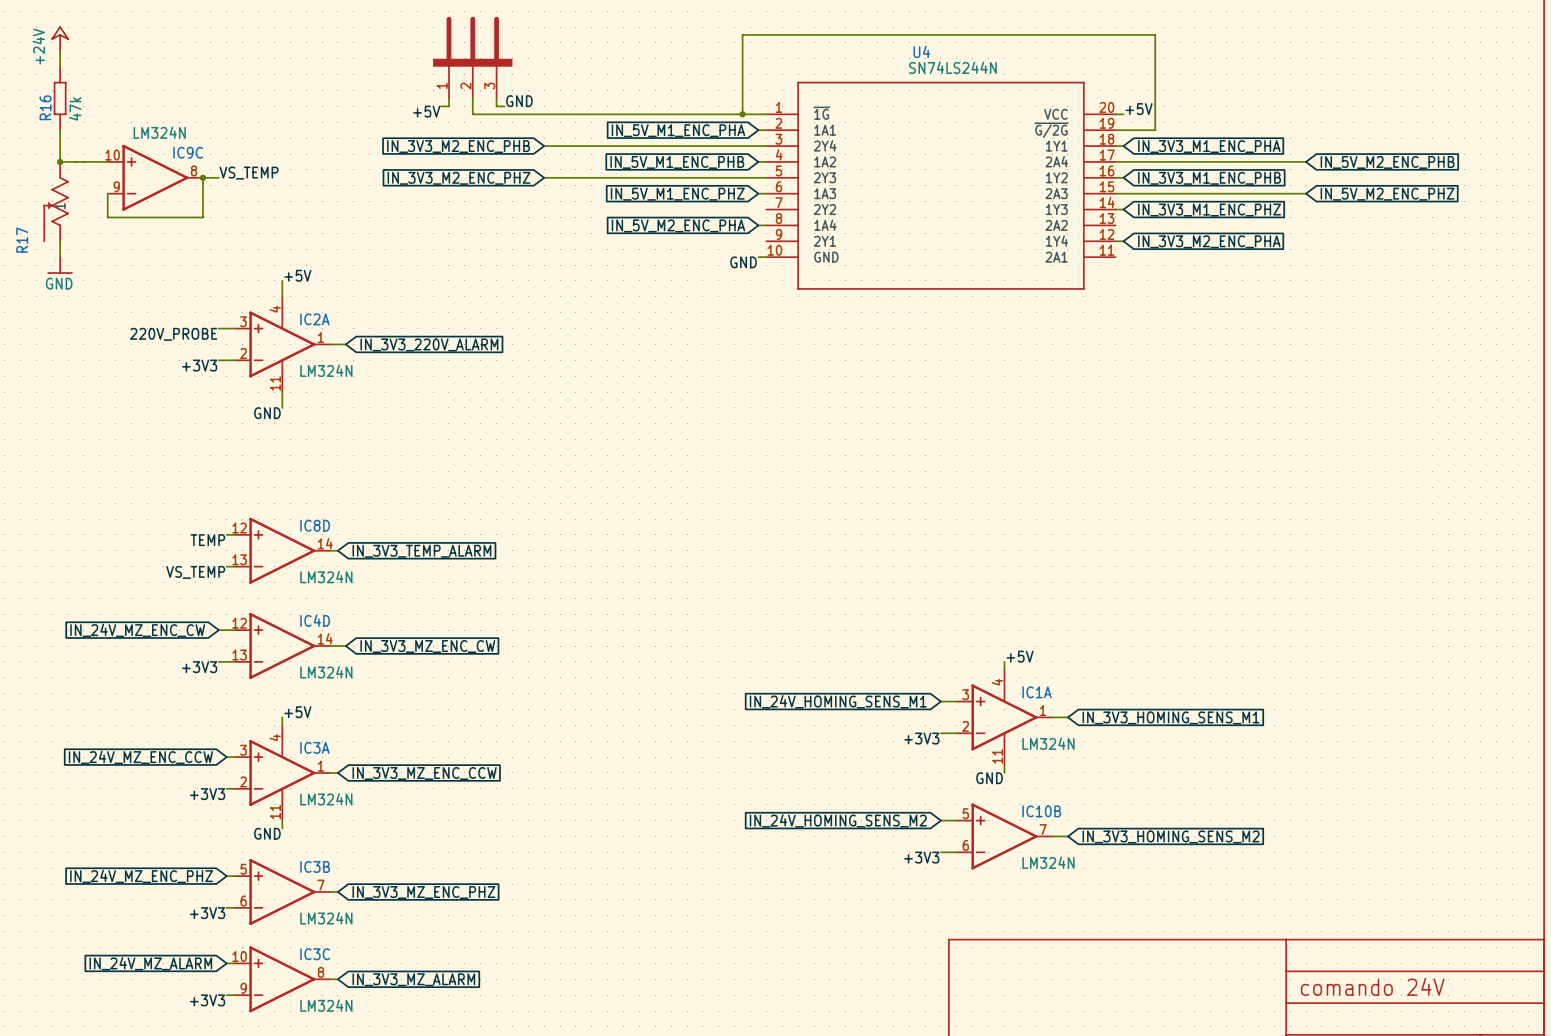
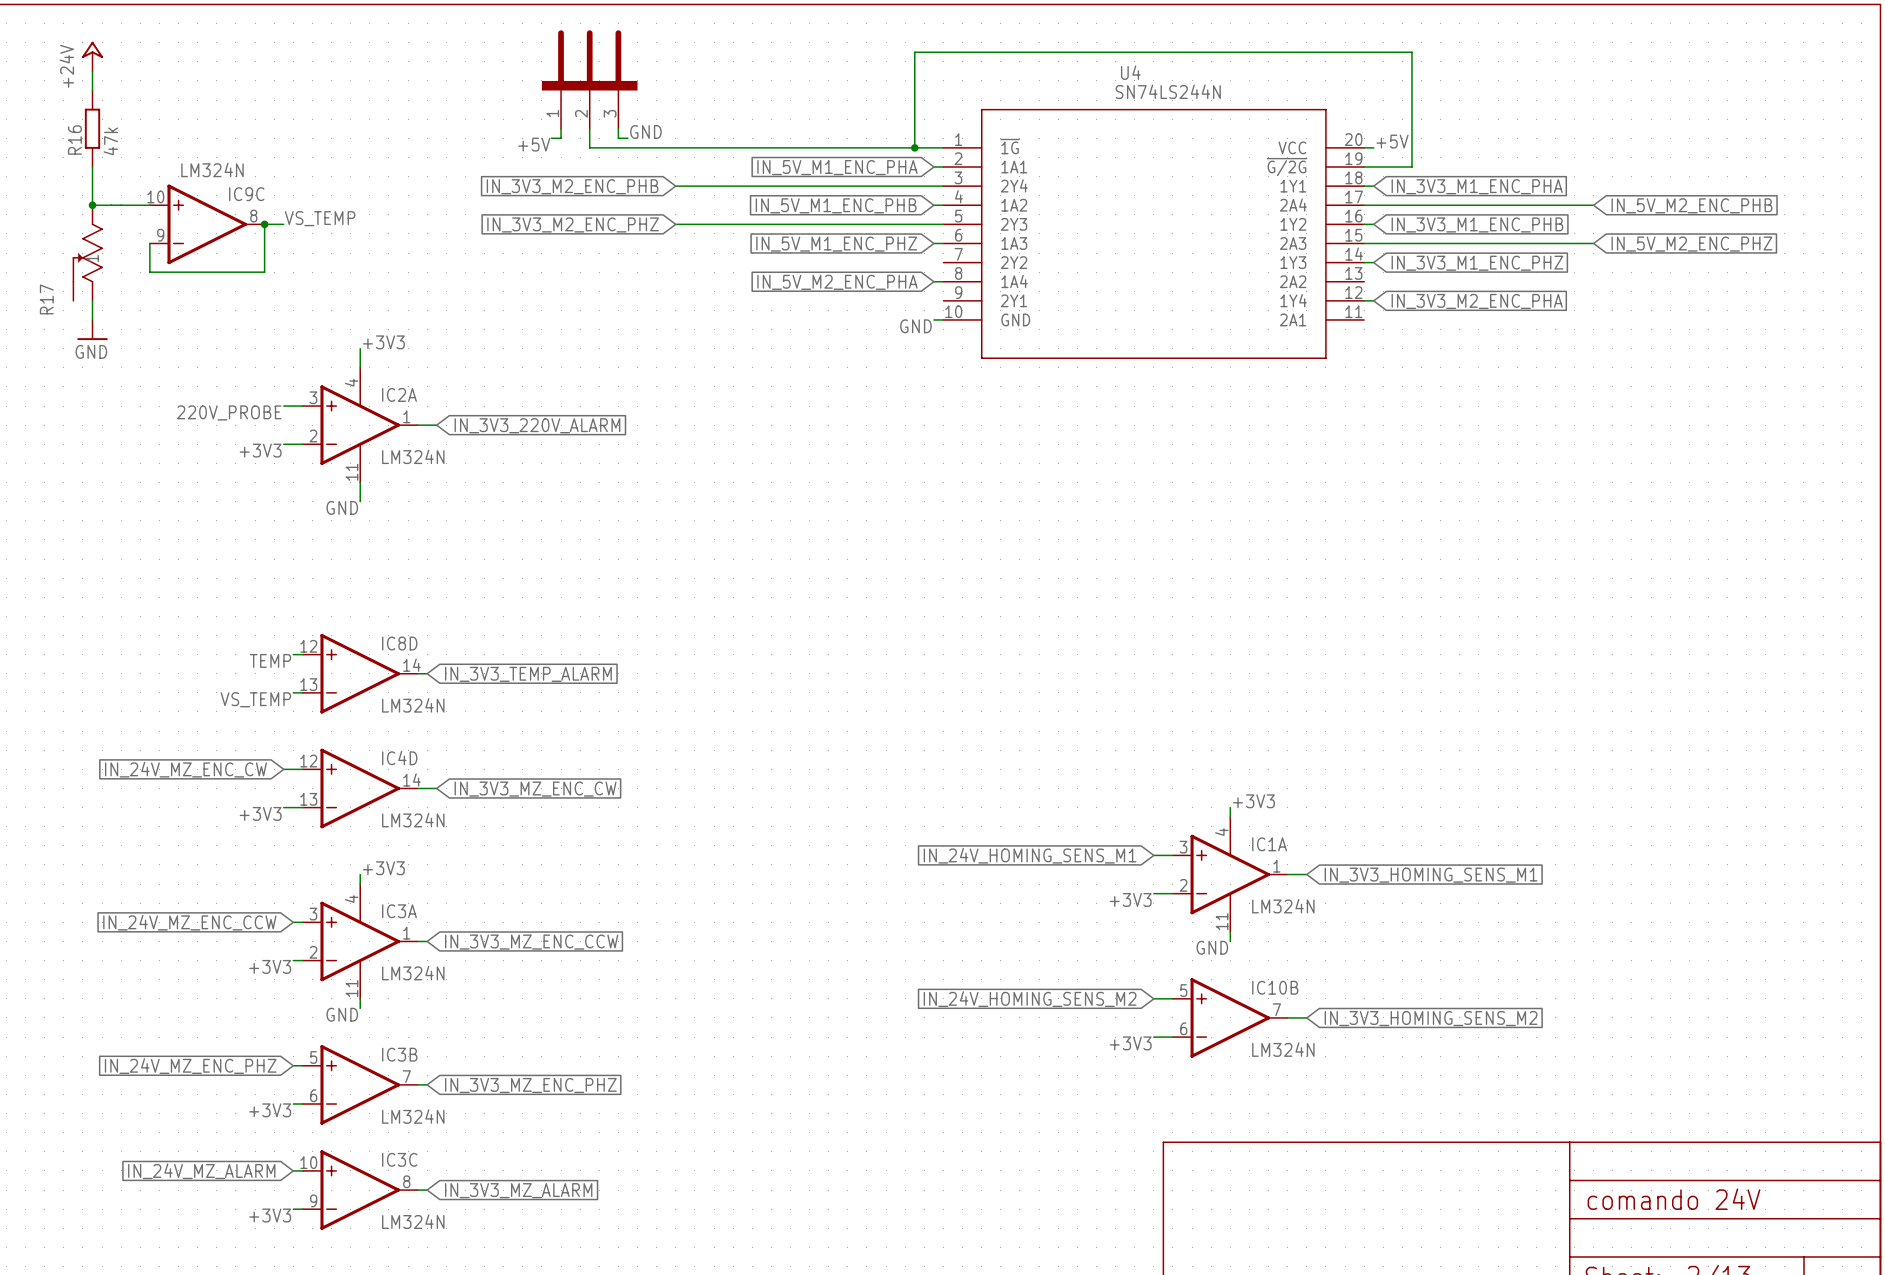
label: +5V (297, 275) -> +3V3 (383, 342)
label: +5V (1020, 656) -> +3V3 (1253, 801)
label: +5V (297, 712) -> +3V3 (383, 868)

